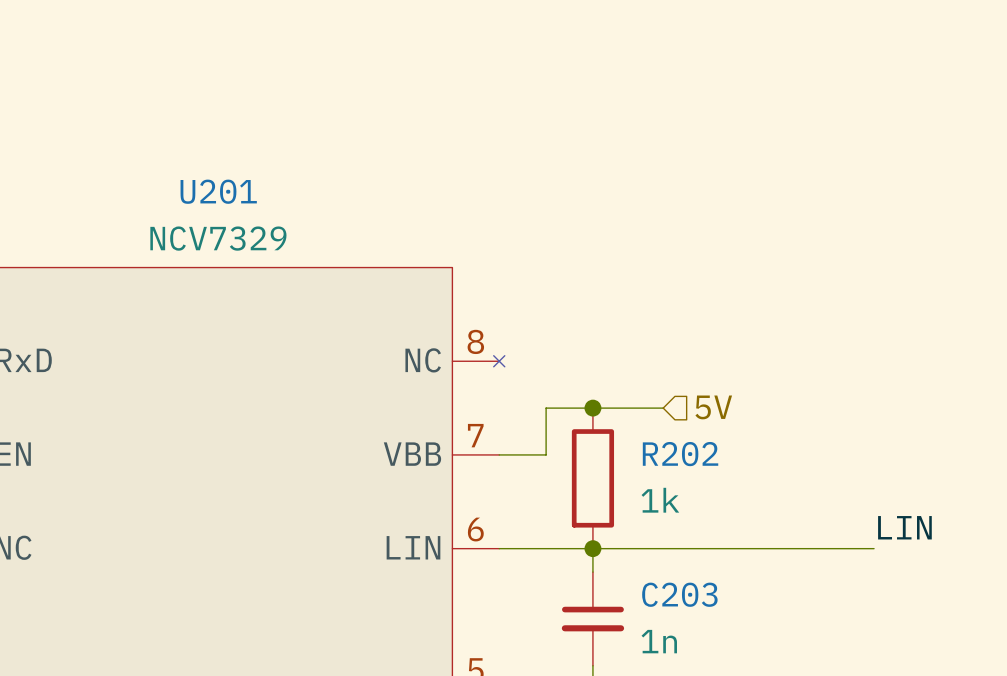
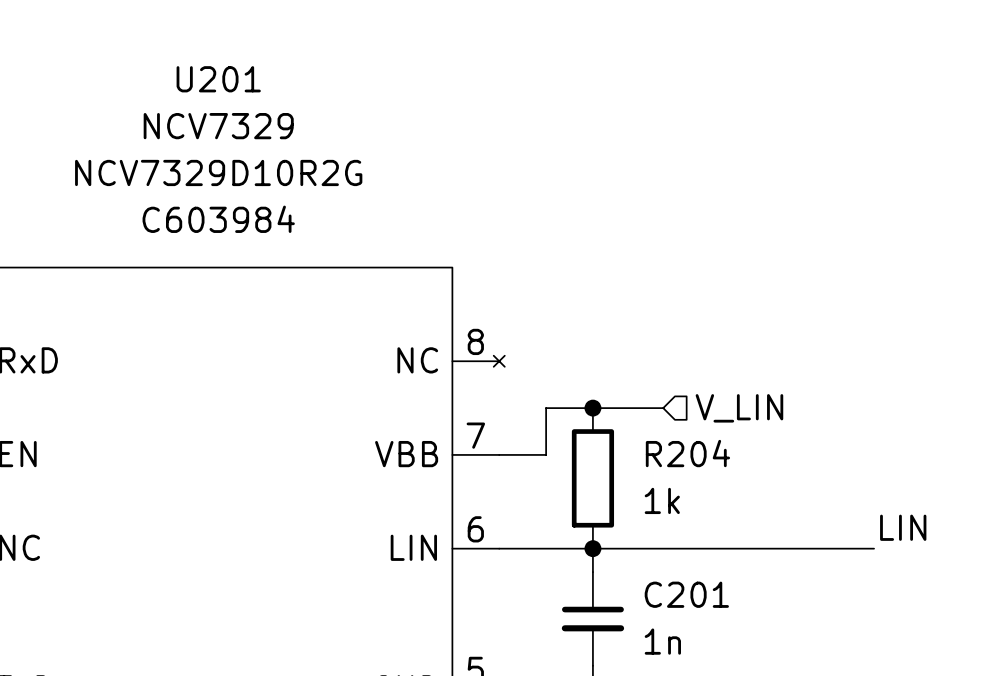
U201 text: none -> NCV7329D10R2G (218, 172)
U201 name position: U201 (218, 191) -> U201 (218, 79)
U201 text: none -> C603984 (218, 219)
U201 value position: NCV7329 (218, 238) -> NCV7329 (218, 126)
hierarchical label: 5V (713, 407) -> V_LIN (739, 408)
R202 name: R202 (680, 454) -> R204 (687, 453)
C203 name: C203 (679, 594) -> C201 (686, 594)

